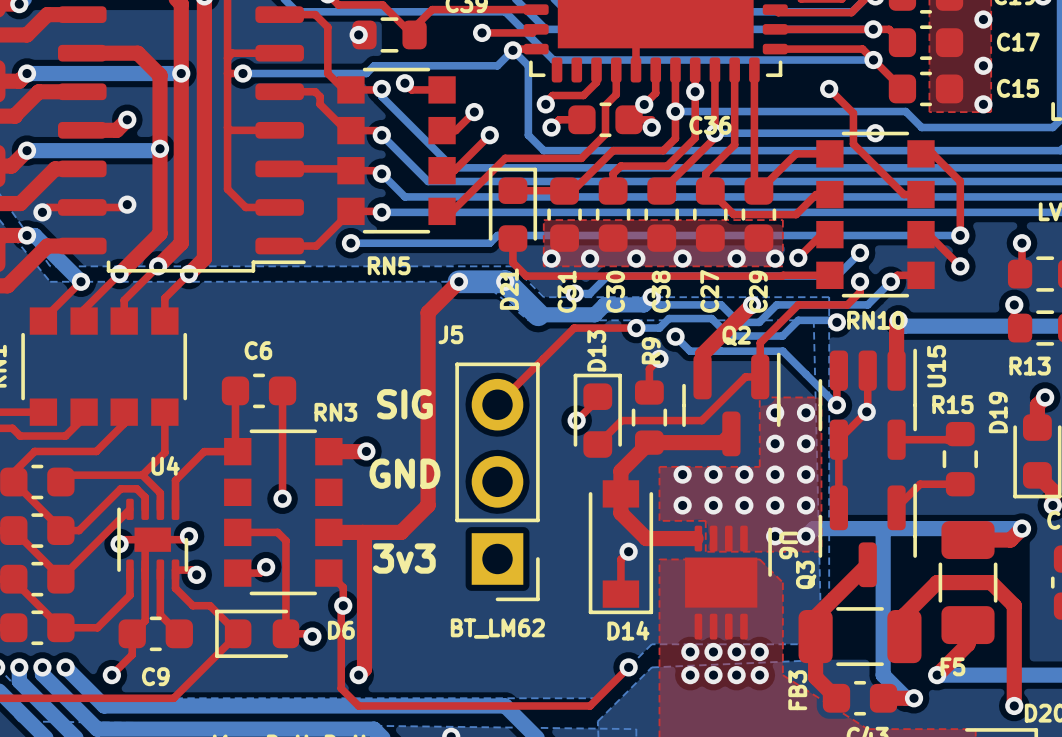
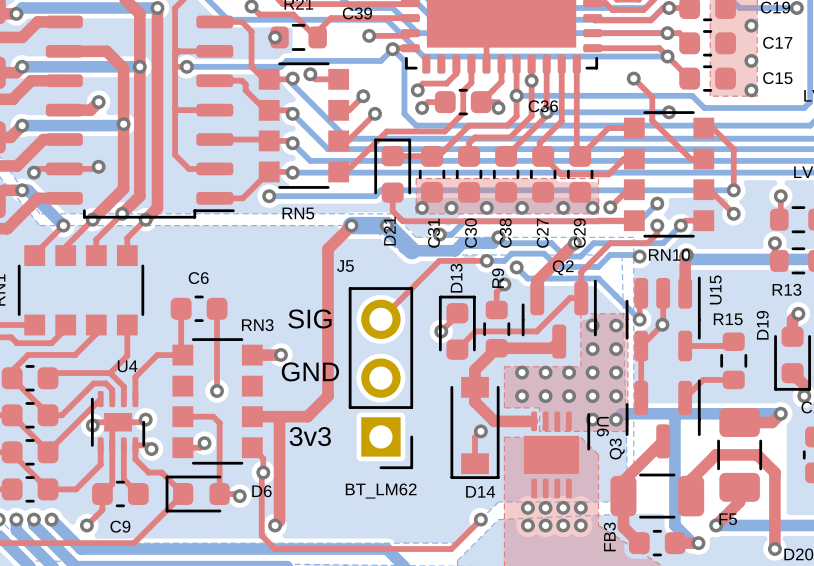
via: (644, 104) -> none

